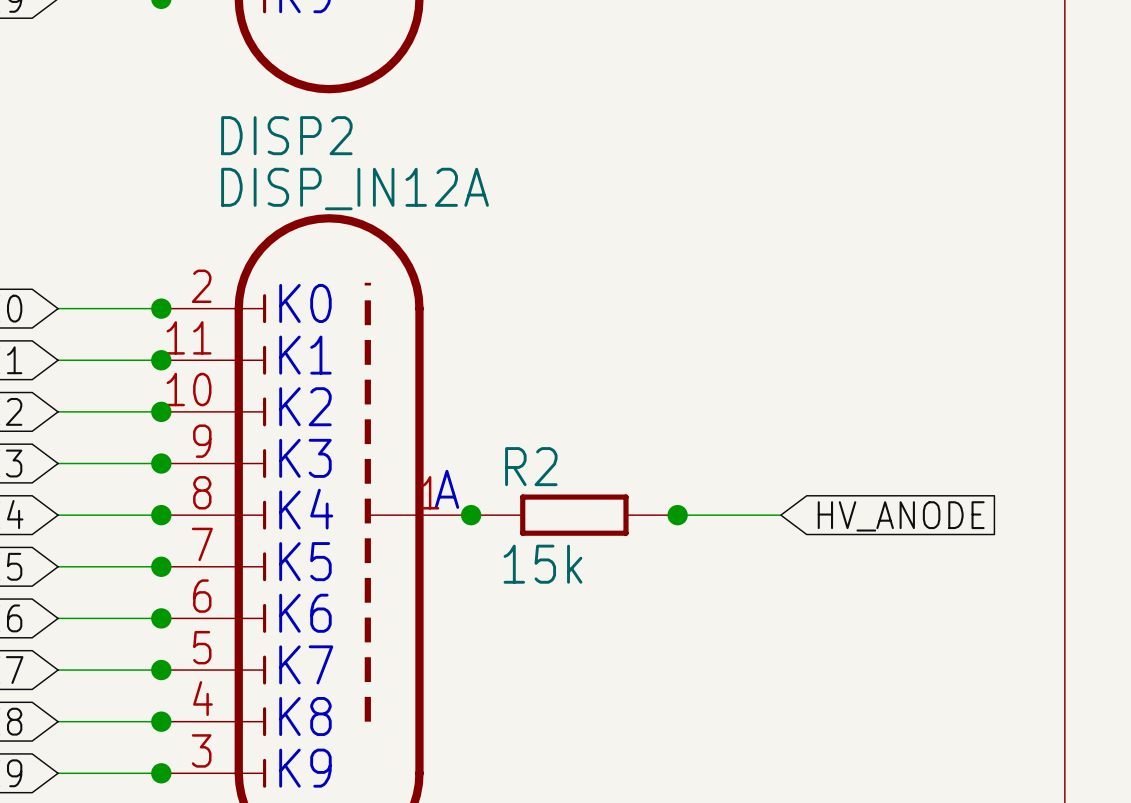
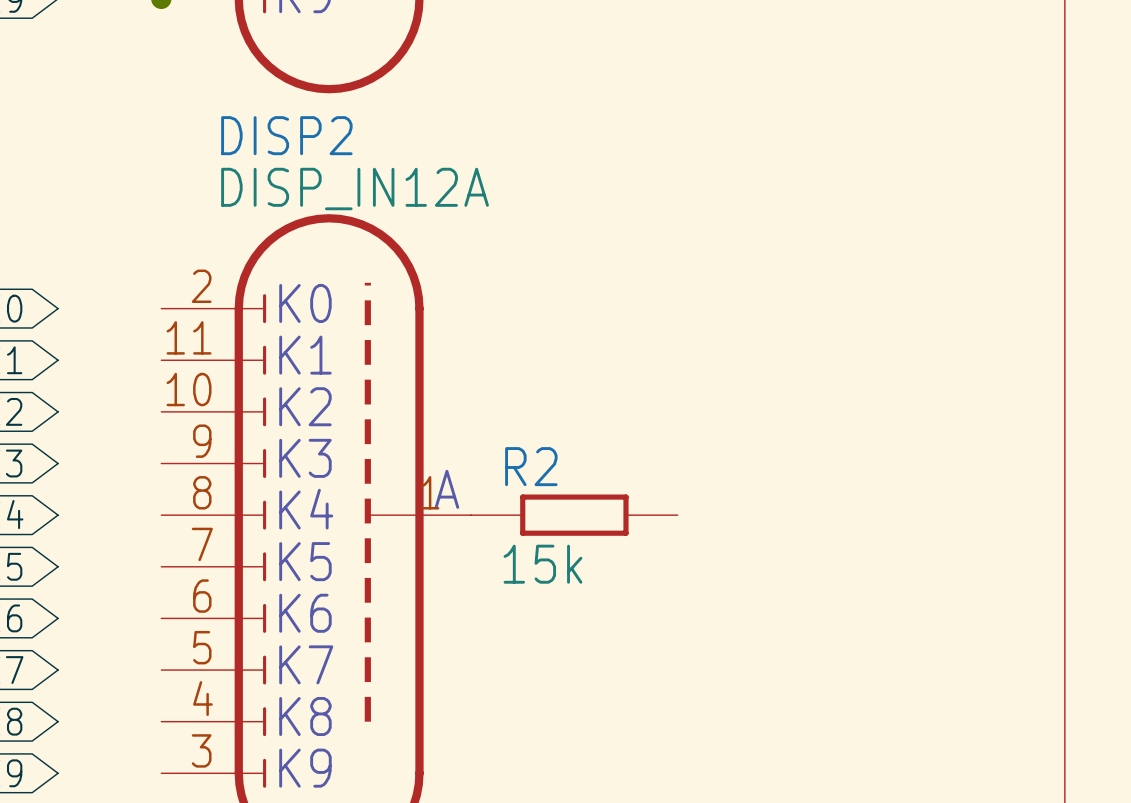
wire: (58, 308) (161, 308) -> none
junction: (161, 308) -> none
wire: (58, 360) (161, 360) -> none
junction: (161, 360) -> none
wire: (58, 411) (161, 411) -> none
junction: (161, 411) -> none
wire: (58, 463) (161, 463) -> none
junction: (161, 463) -> none
wire: (58, 515) (161, 515) -> none
junction: (161, 515) -> none
junction: (471, 515) -> none
wire: (677, 515) (780, 515) -> none
junction: (677, 515) -> none
global label: HV_ANODE (901, 516) -> none
wire: (58, 566) (161, 566) -> none
junction: (161, 566) -> none
wire: (58, 618) (161, 618) -> none
junction: (161, 618) -> none
wire: (58, 670) (161, 670) -> none
junction: (161, 670) -> none
wire: (58, 721) (161, 721) -> none
junction: (161, 721) -> none
wire: (58, 773) (161, 773) -> none
junction: (161, 773) -> none

